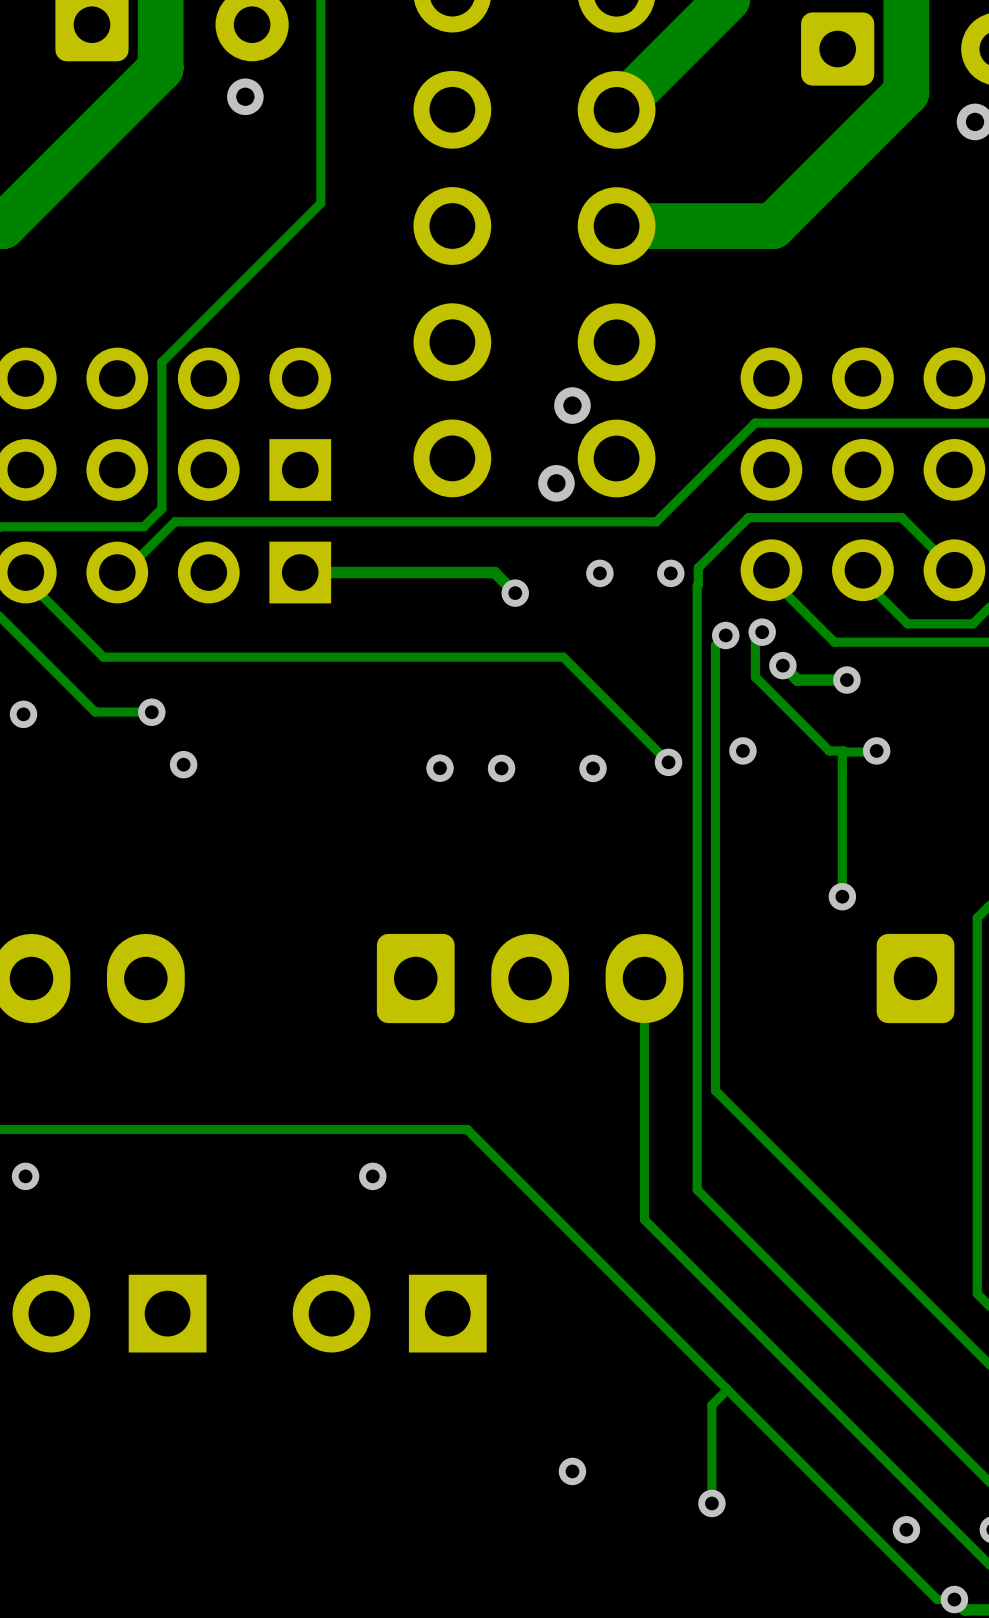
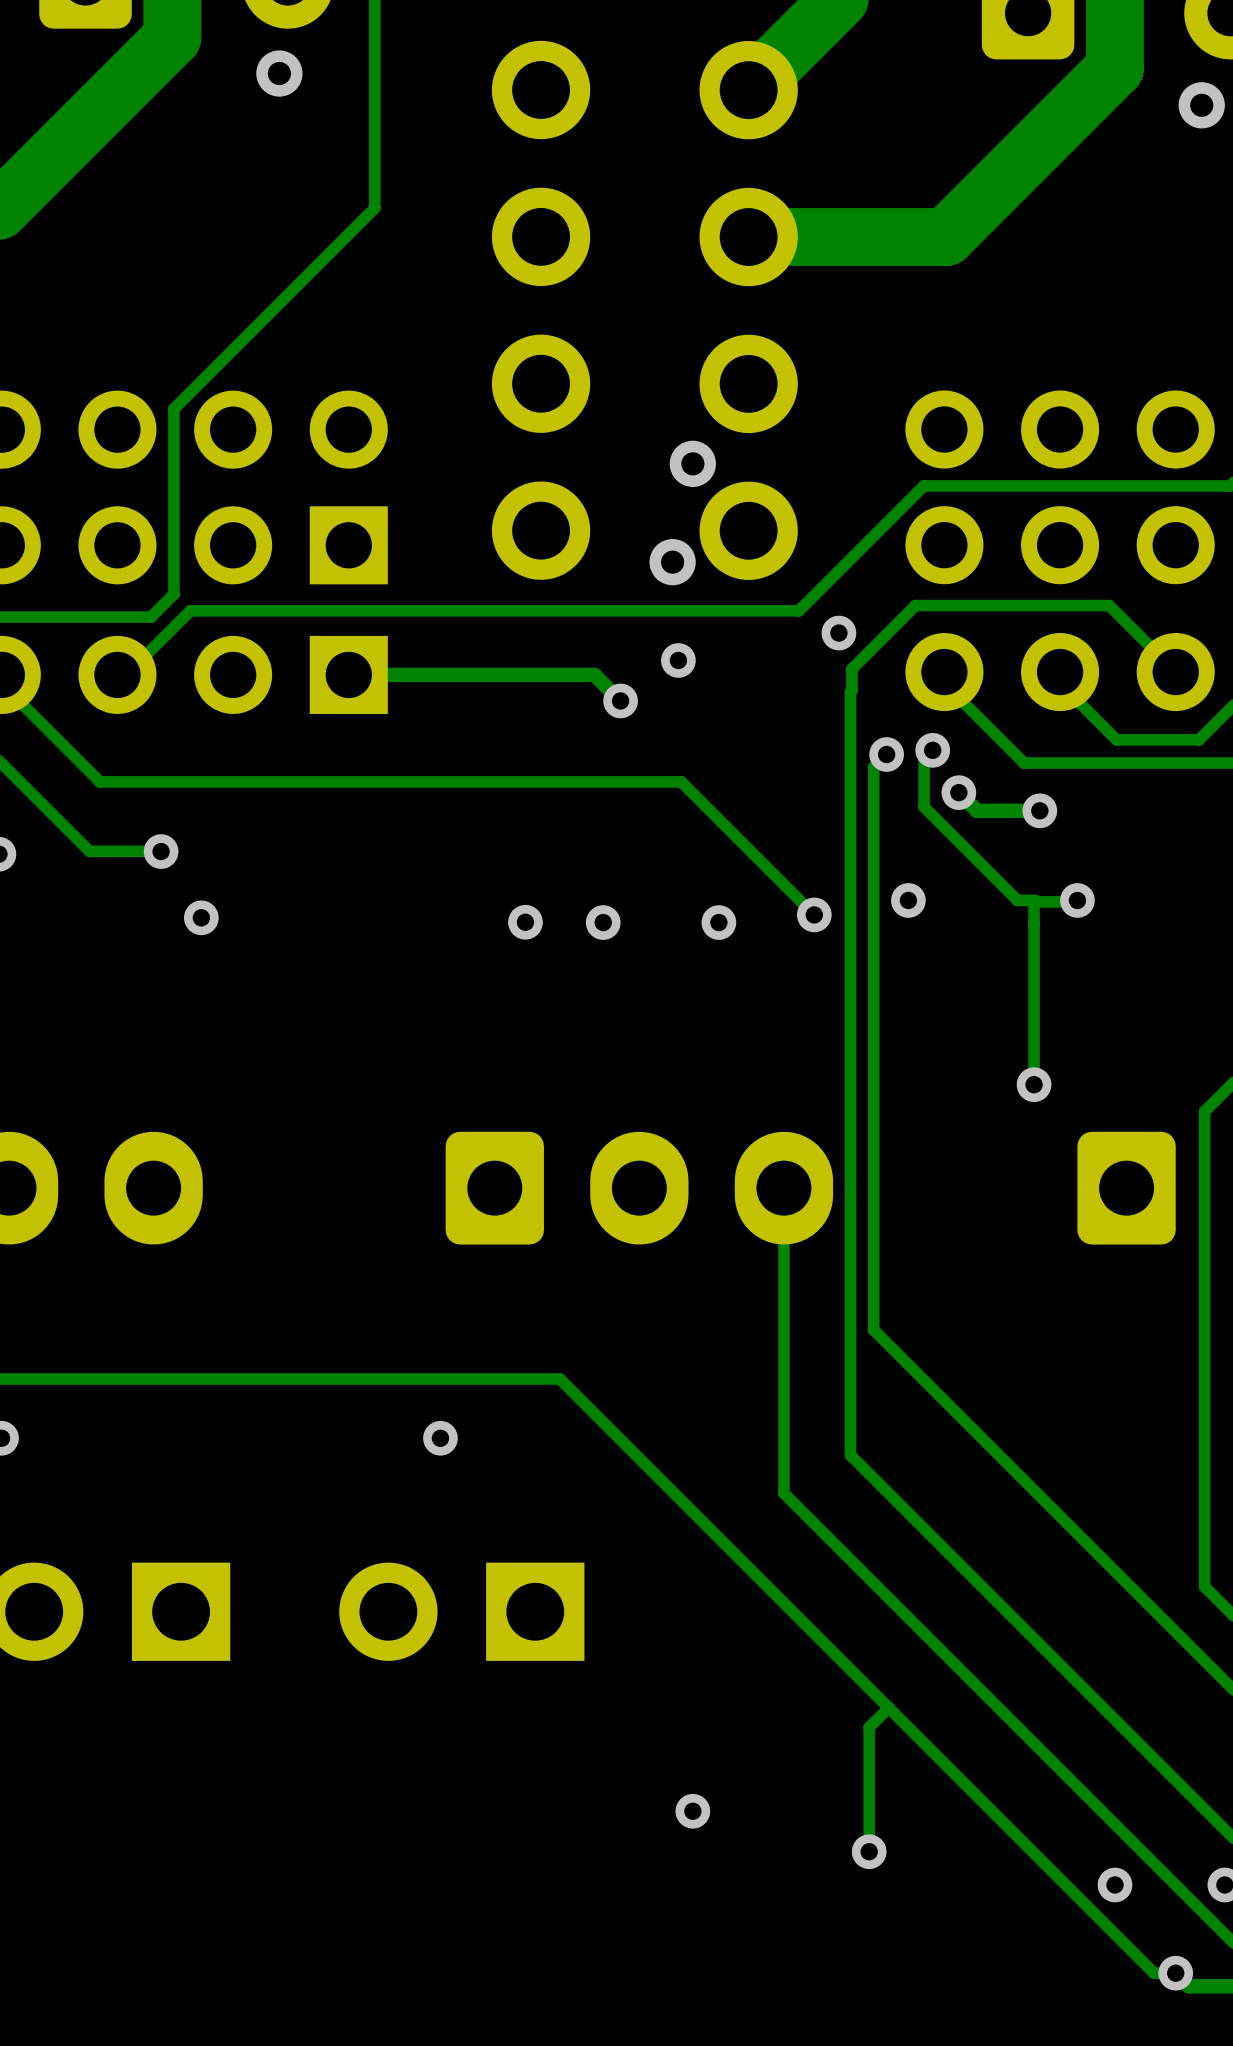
via position: (599, 573) -> (678, 660)
via position: (670, 573) -> (838, 633)

